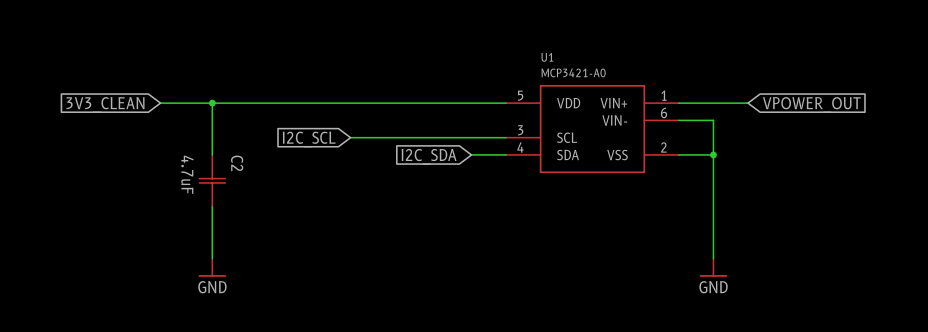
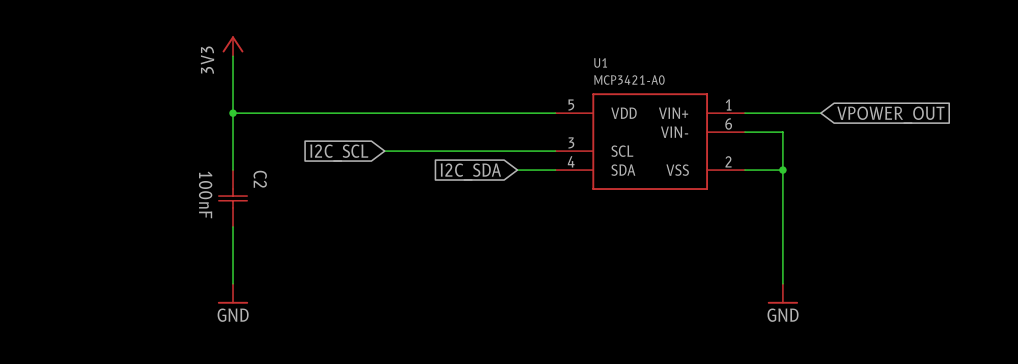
power symbol: none -> 3V3 (233, 46)
wire: (160, 103) (212, 103) -> (233, 56) (233, 113)
global label: 3V3_CLEAN (105, 104) -> none
C2 value: 4.7uF (187, 174) -> 100nF (205, 194)

